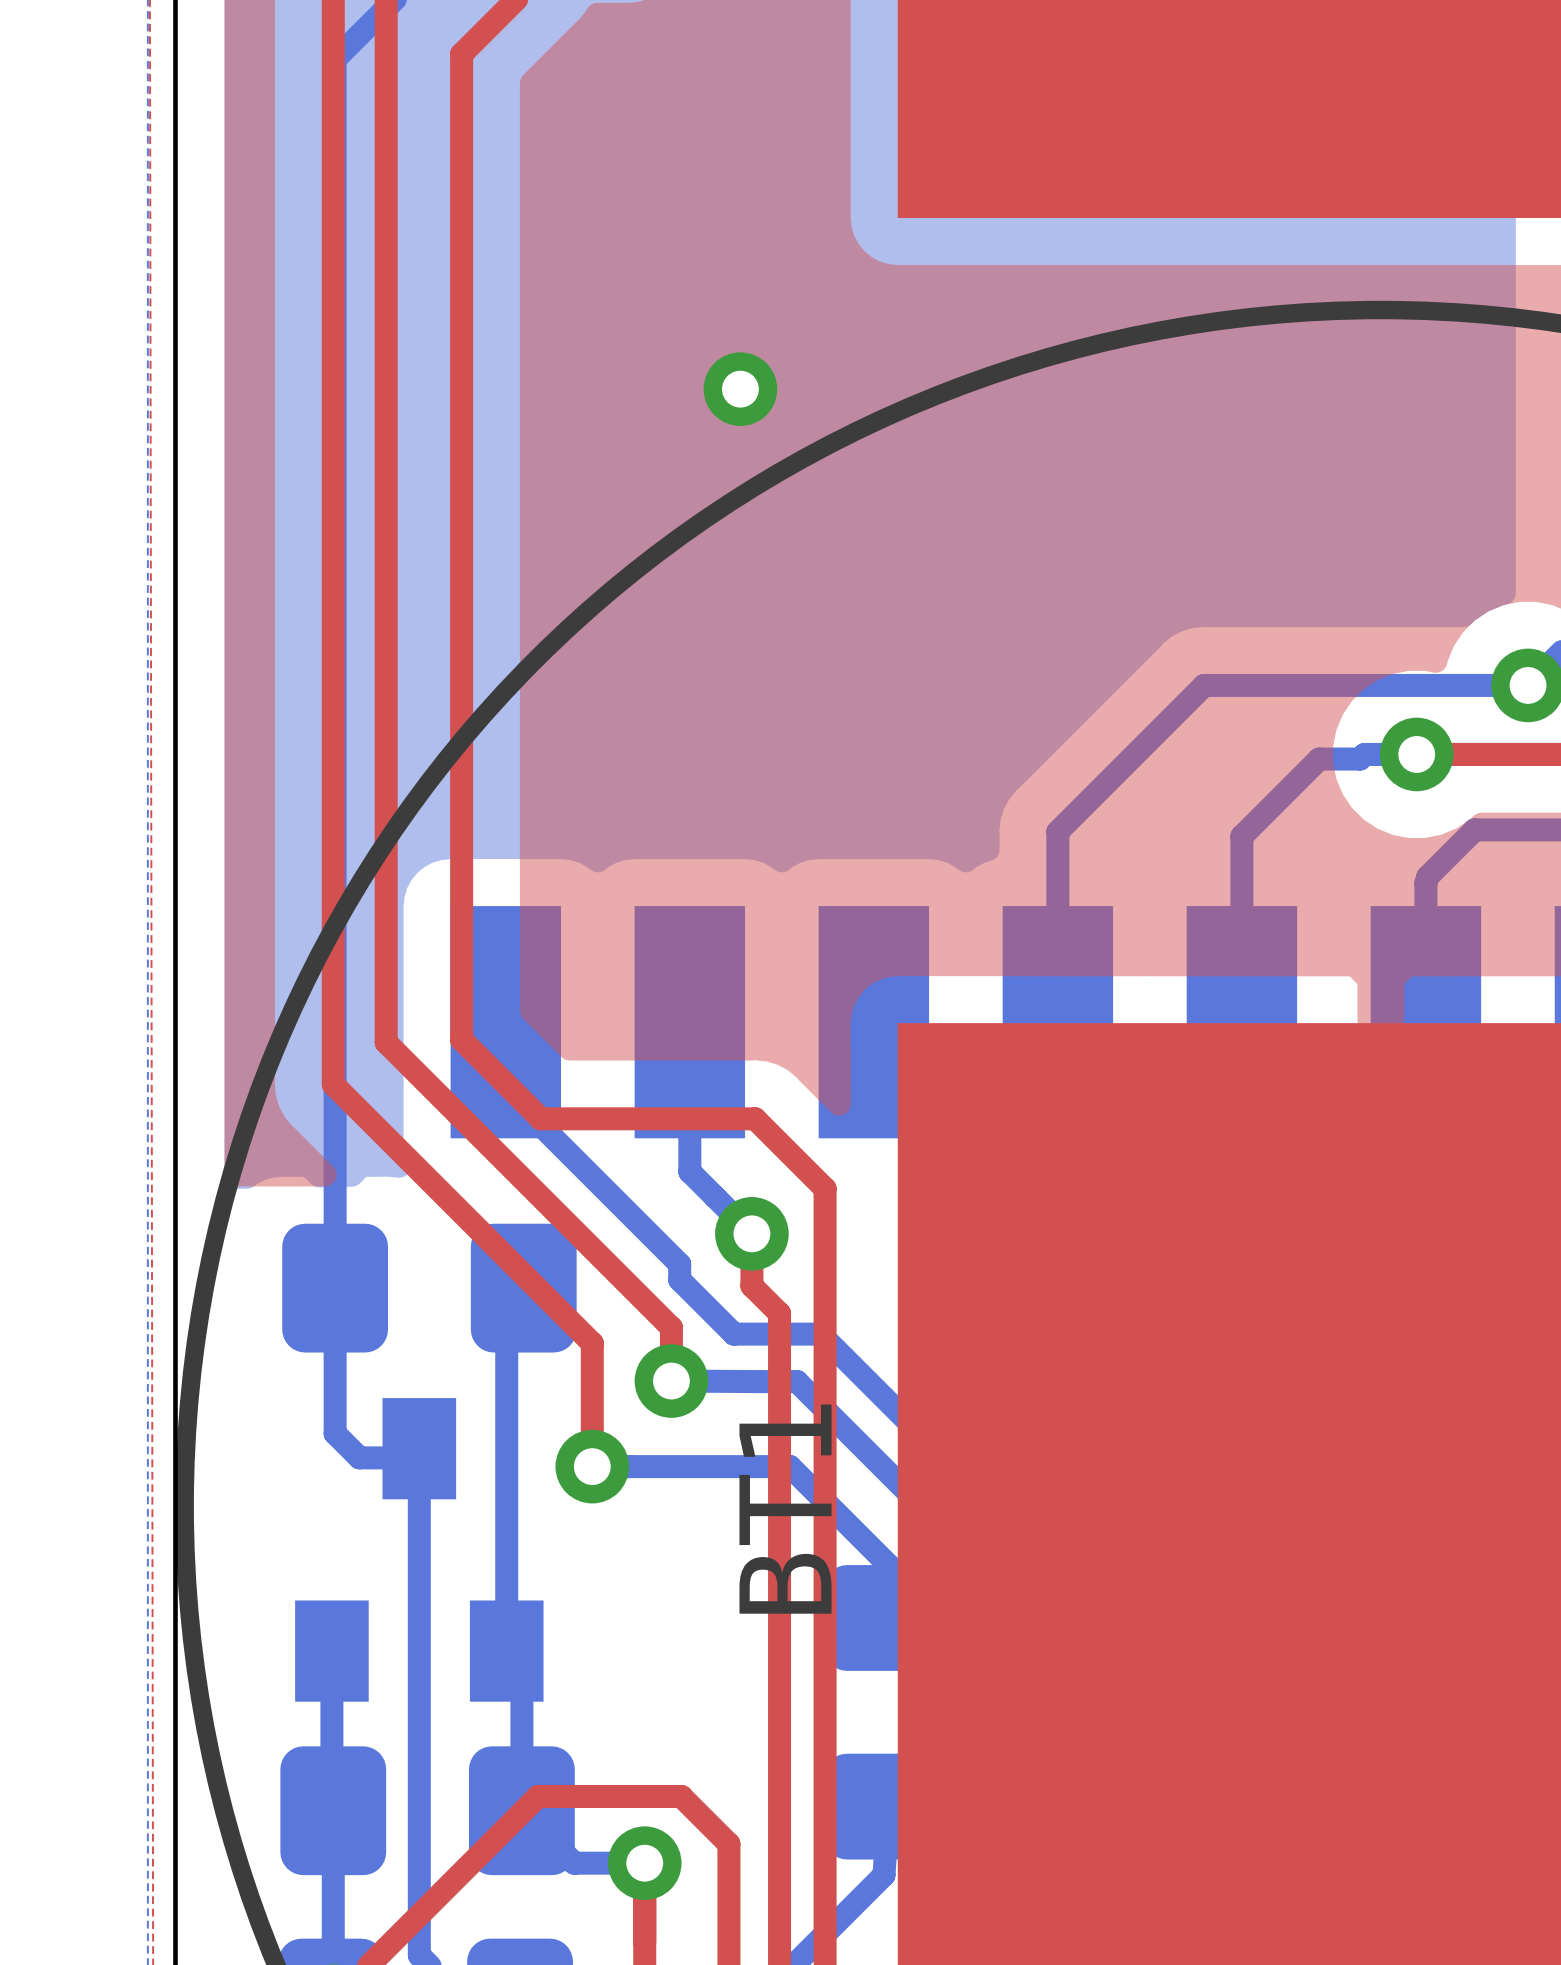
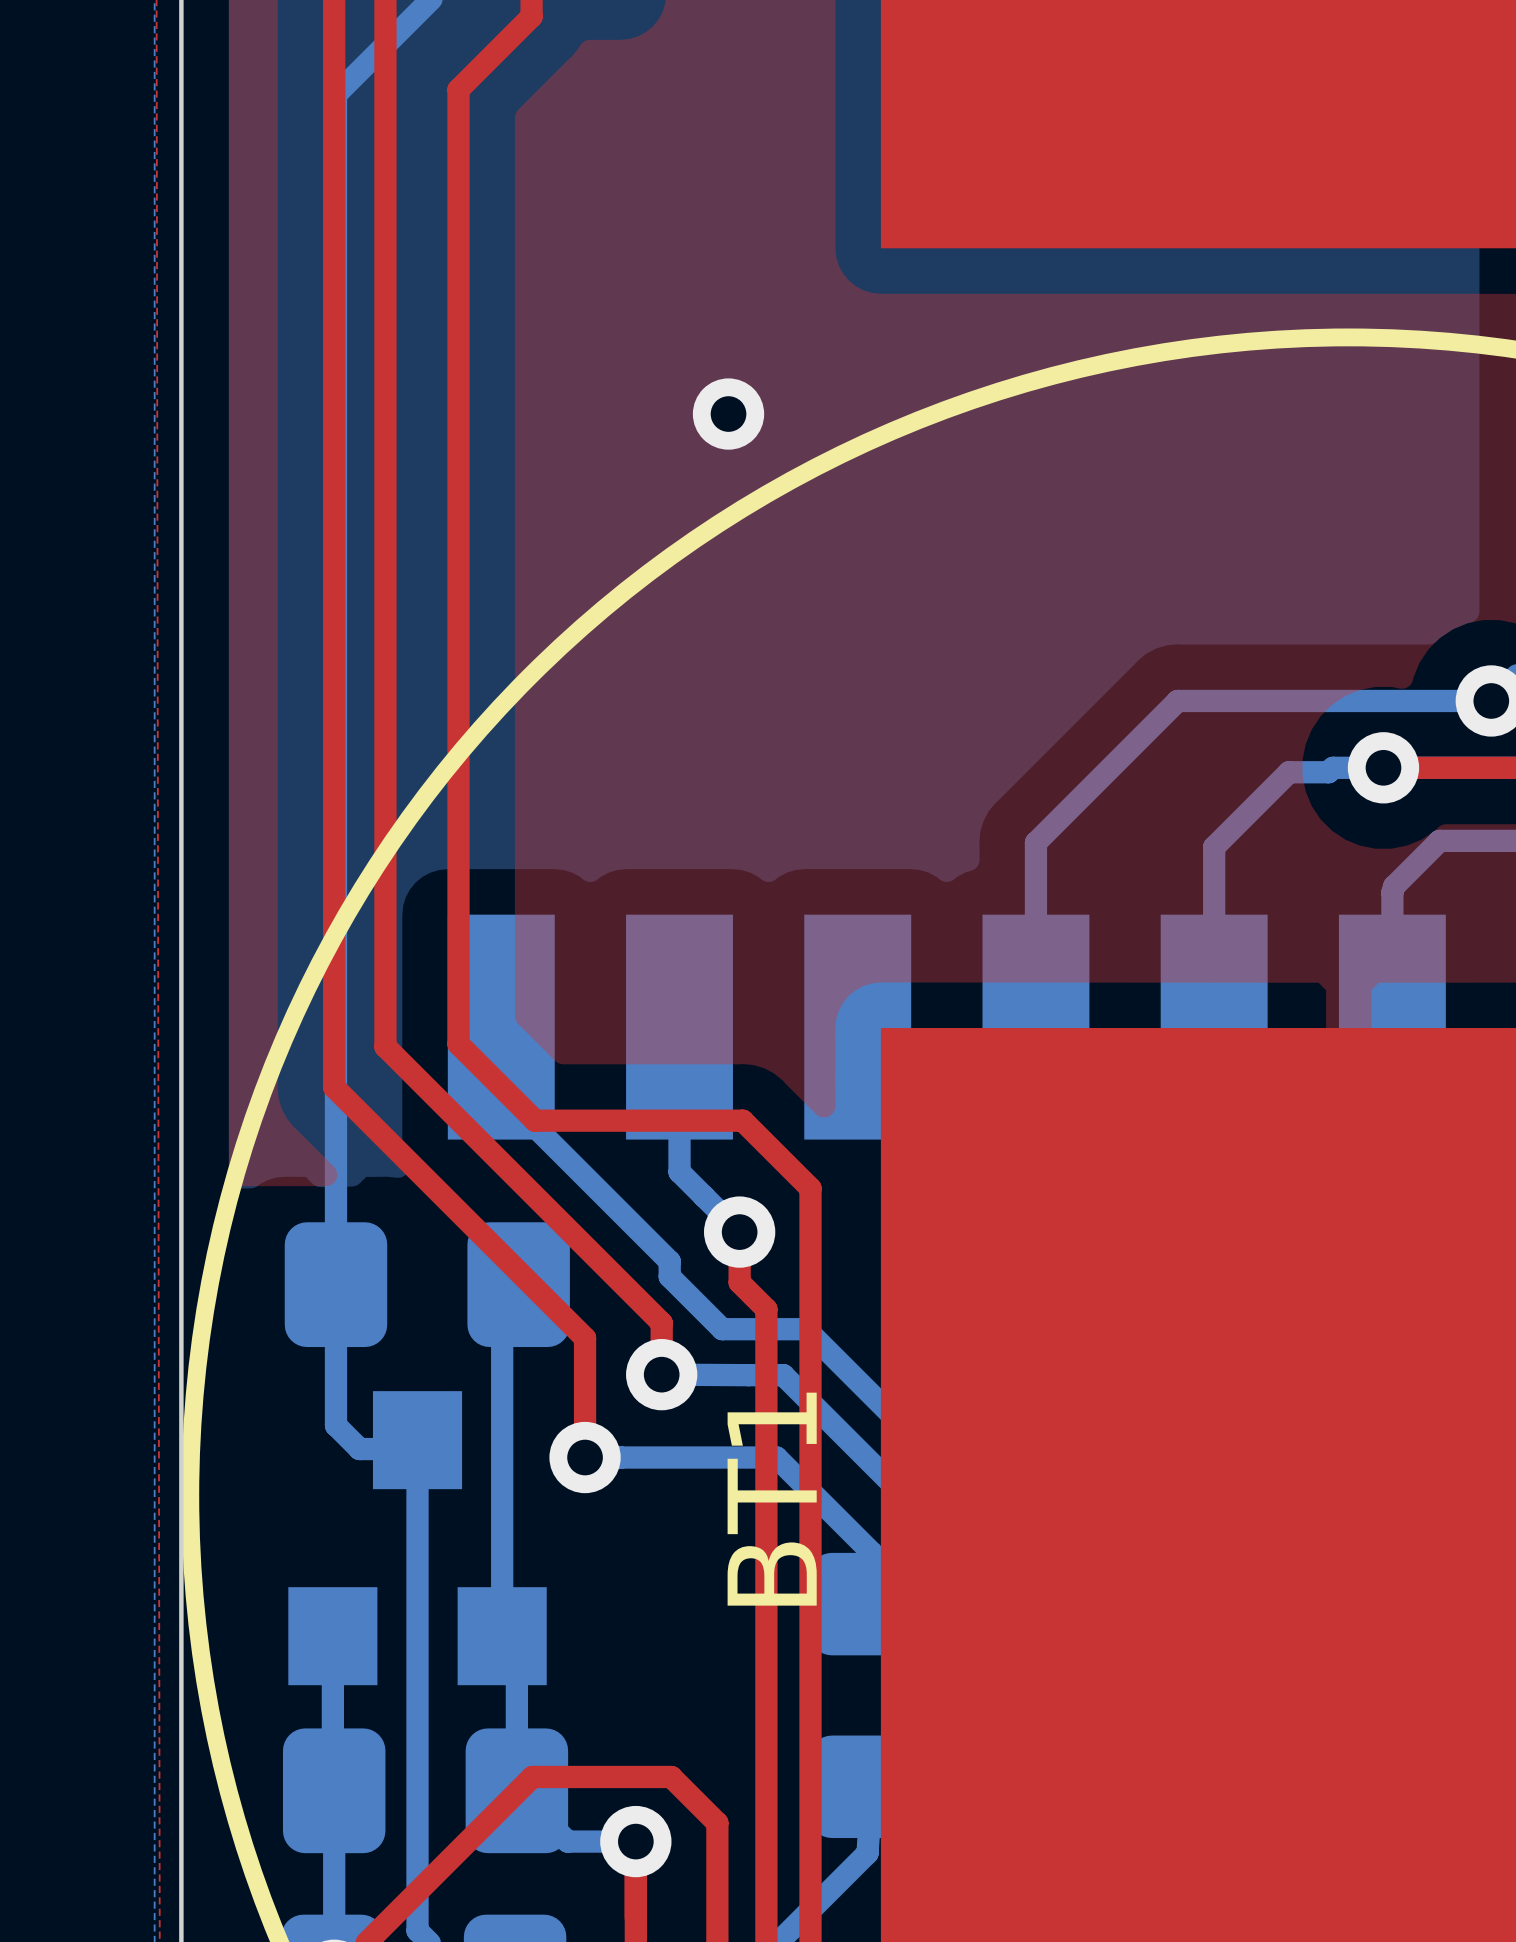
part footprint: [295, 1398, 544, 1702] -> [288, 1391, 547, 1686]

